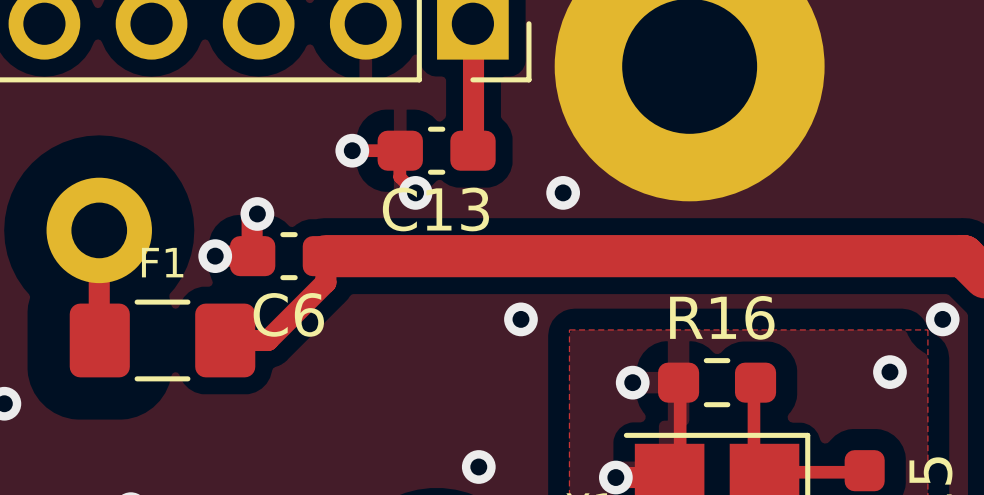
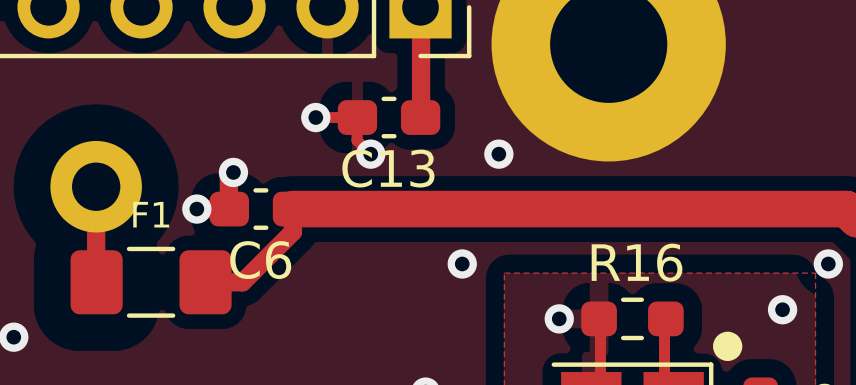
drawing: none -> [713, 331, 743, 361]

